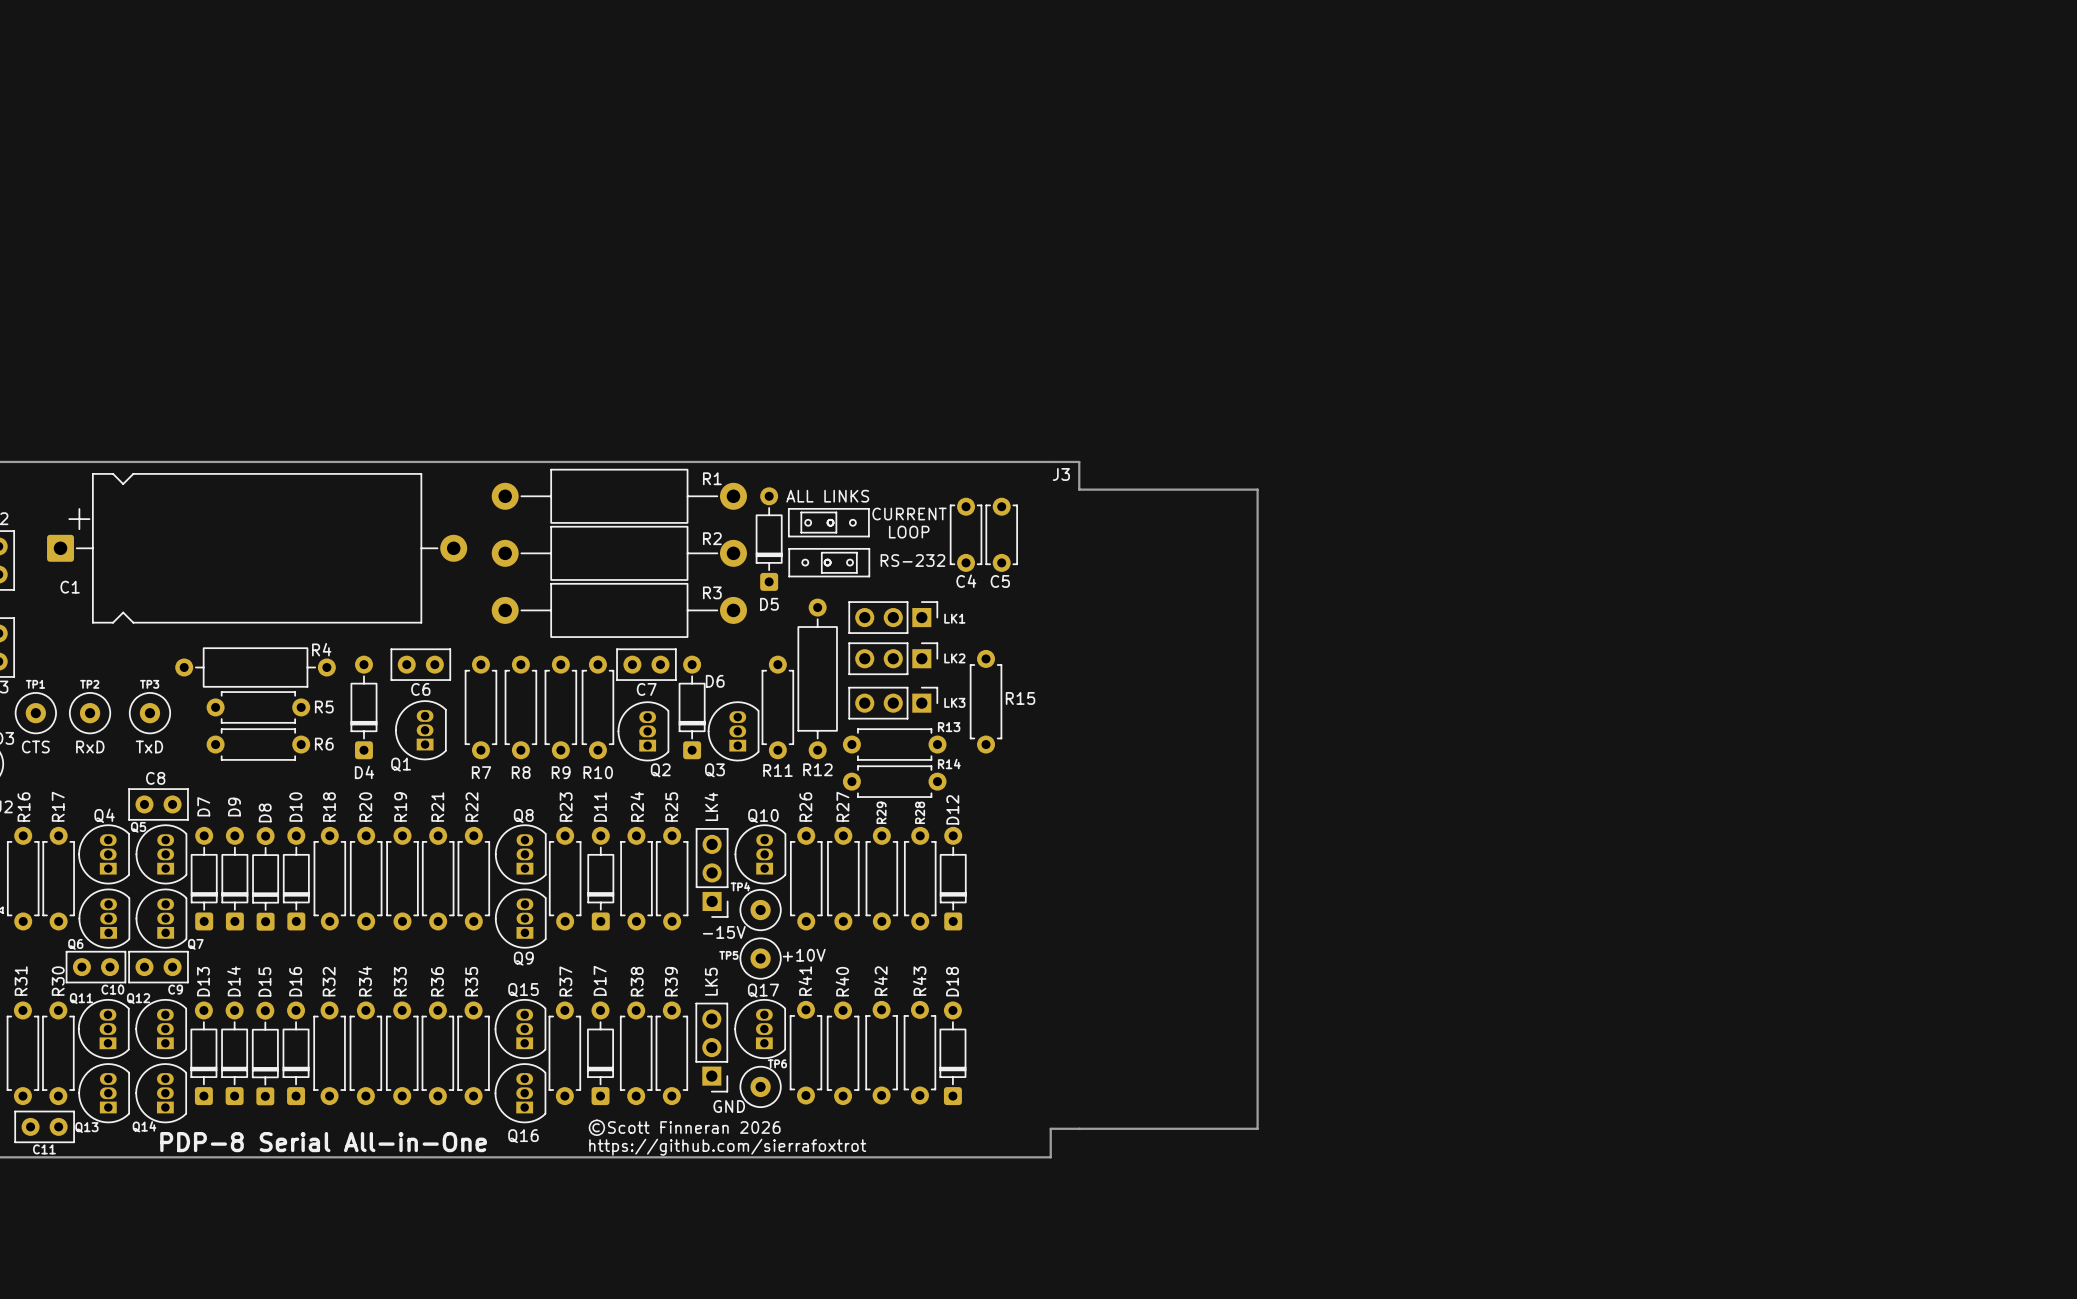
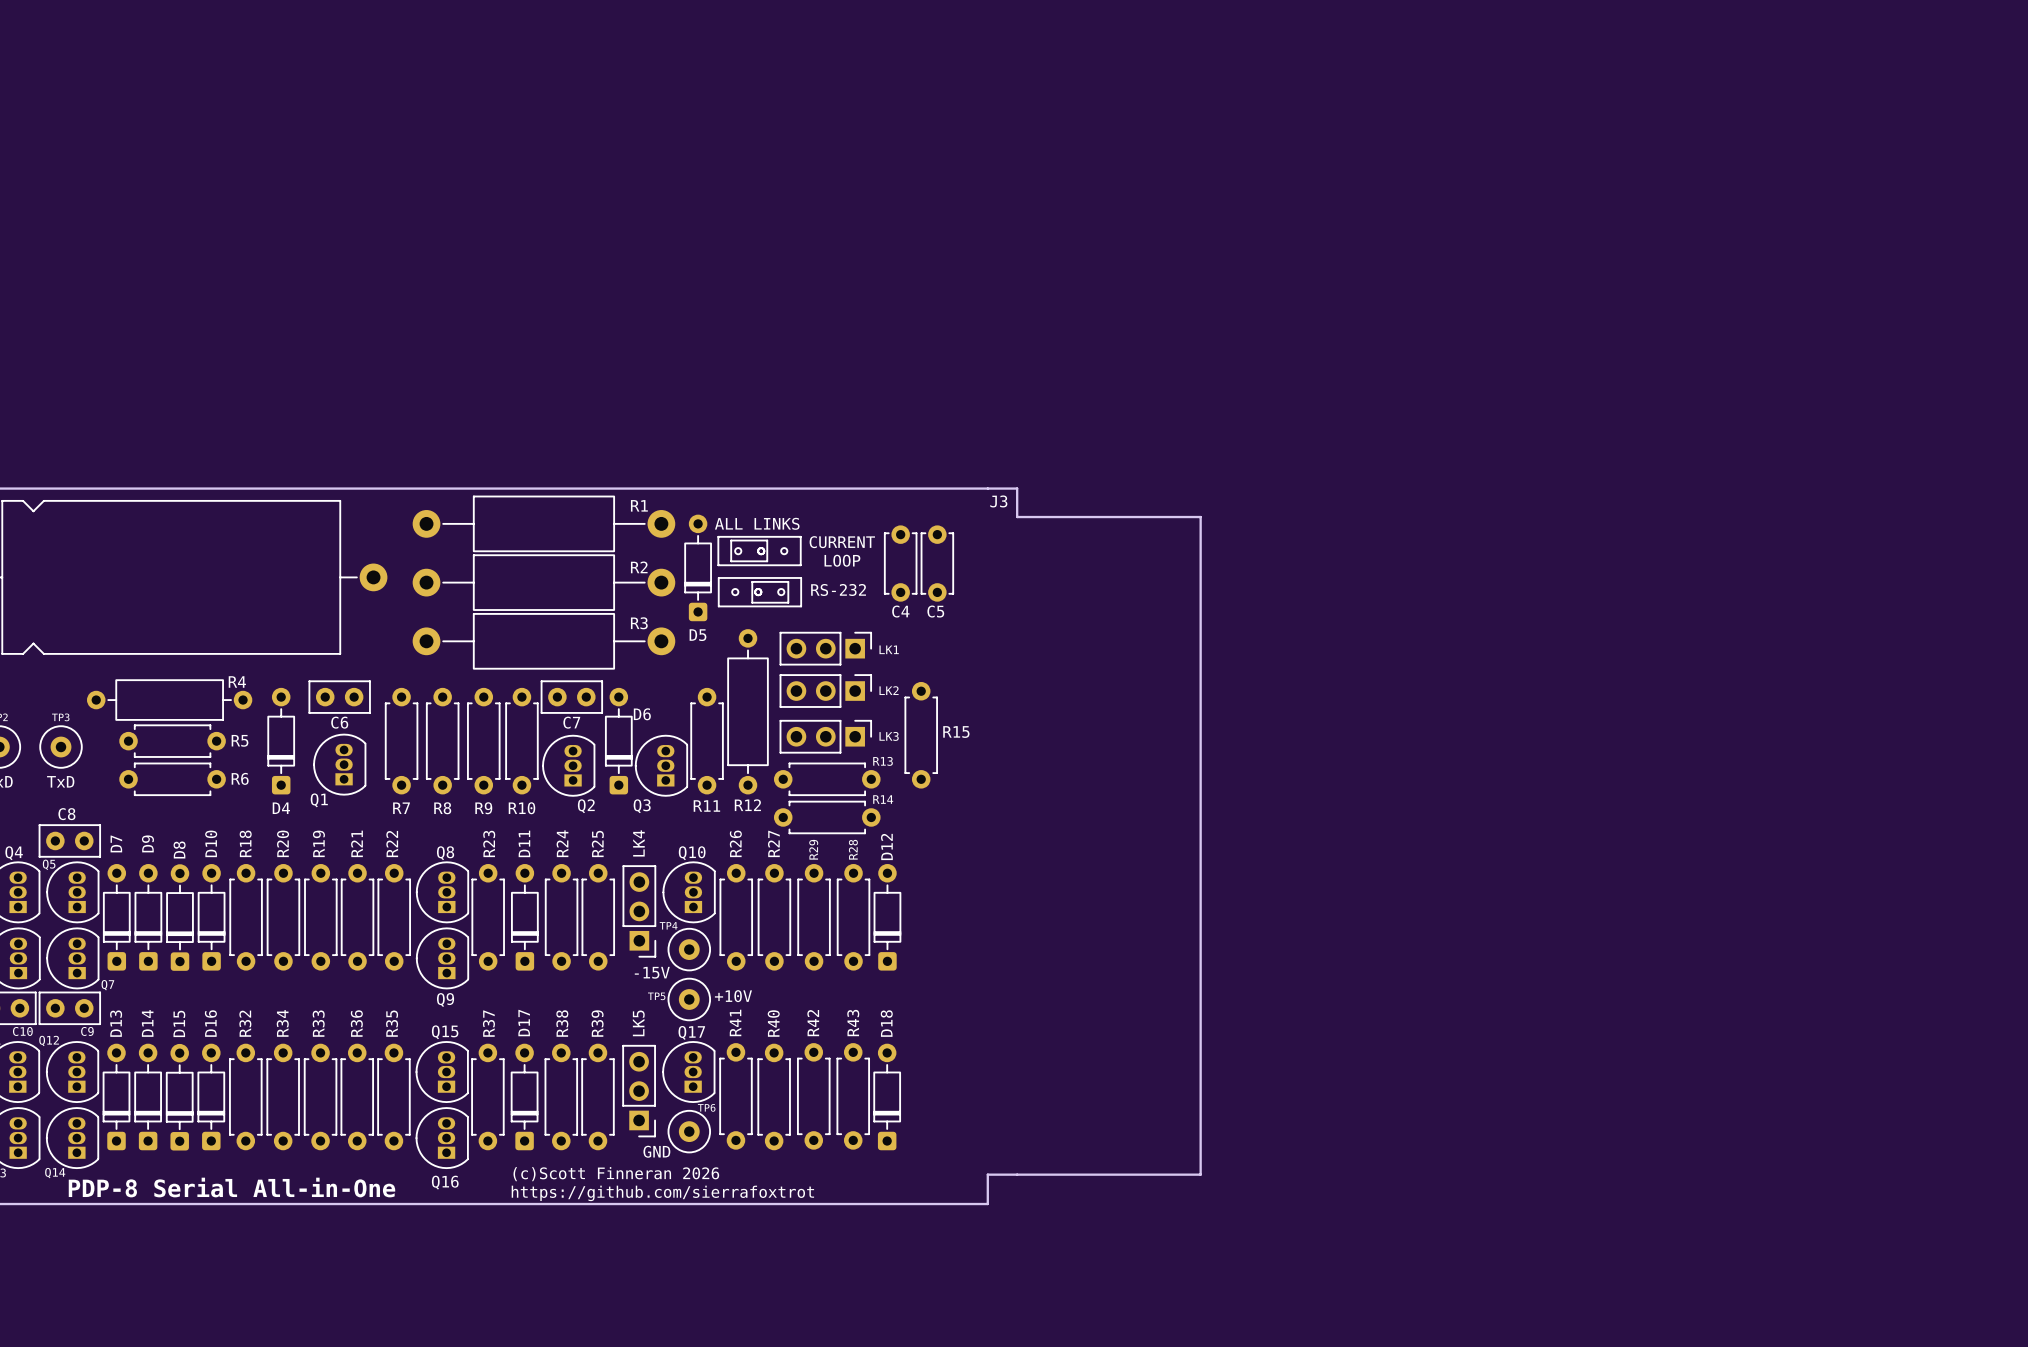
text: ©Scott Finneran 2026 (684, 1127) -> (c)Scott Finneran 2026 (616, 1174)

